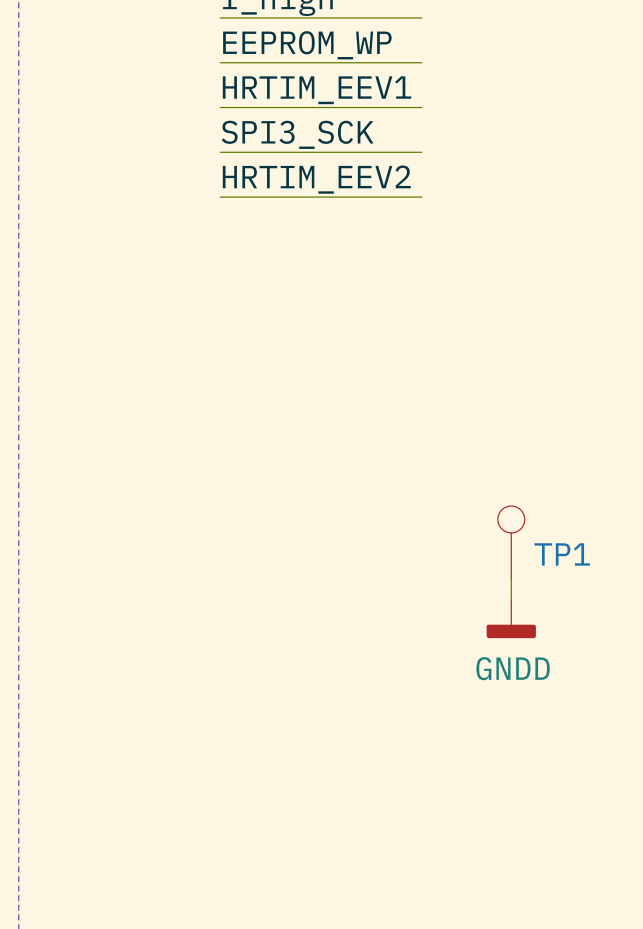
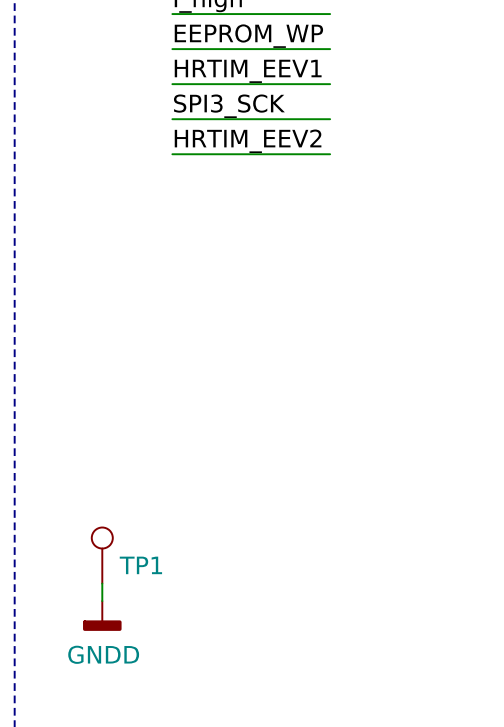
TP1 position: (511, 541) -> (102, 555)
wire: (511, 577) (511, 600) -> (102, 583) (102, 601)
power symbol position: GNDD (511, 619) -> GNDD (102, 616)

